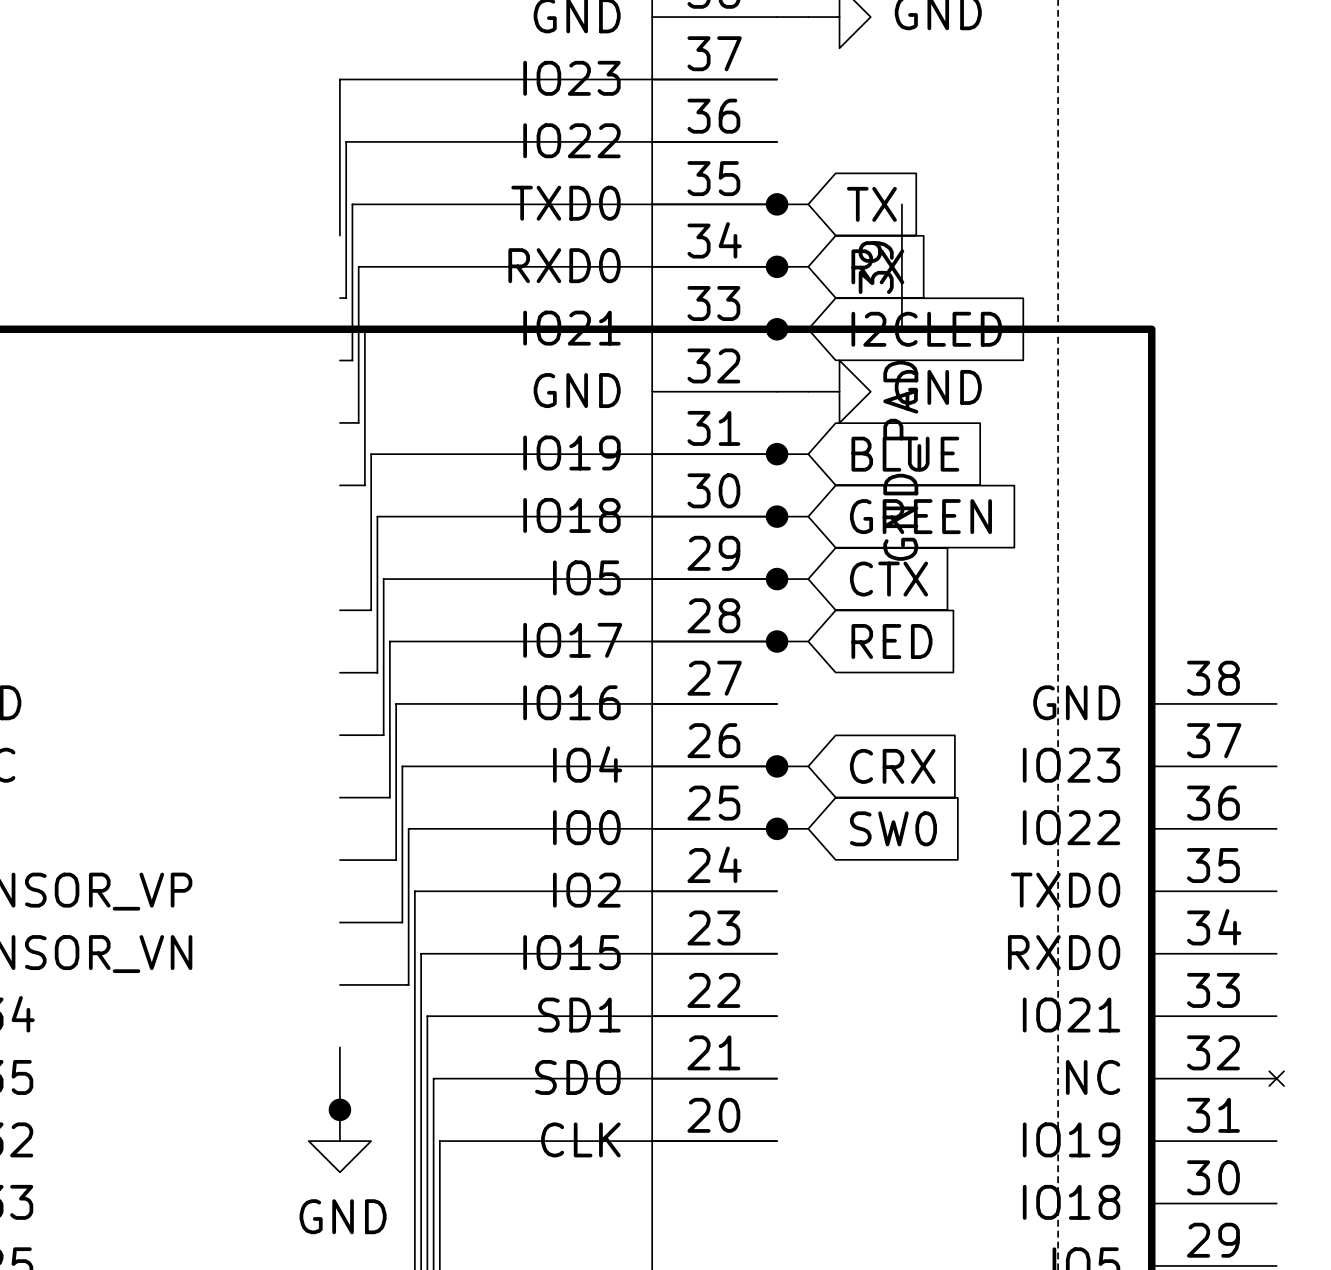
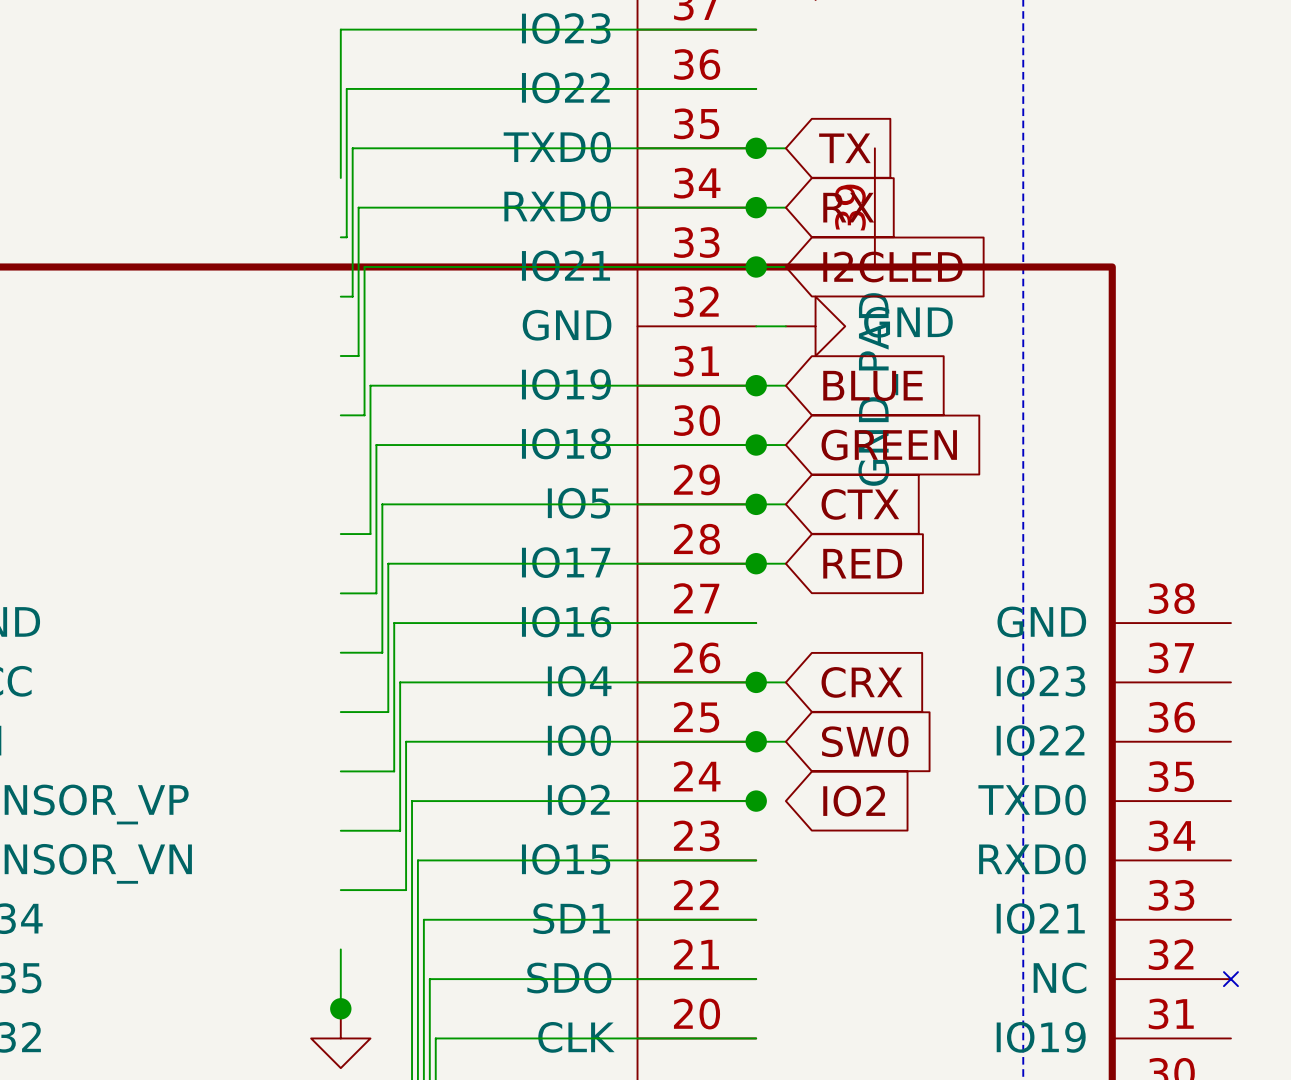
junction: none -> (756, 801)
global label: none -> IO2 (854, 801)

